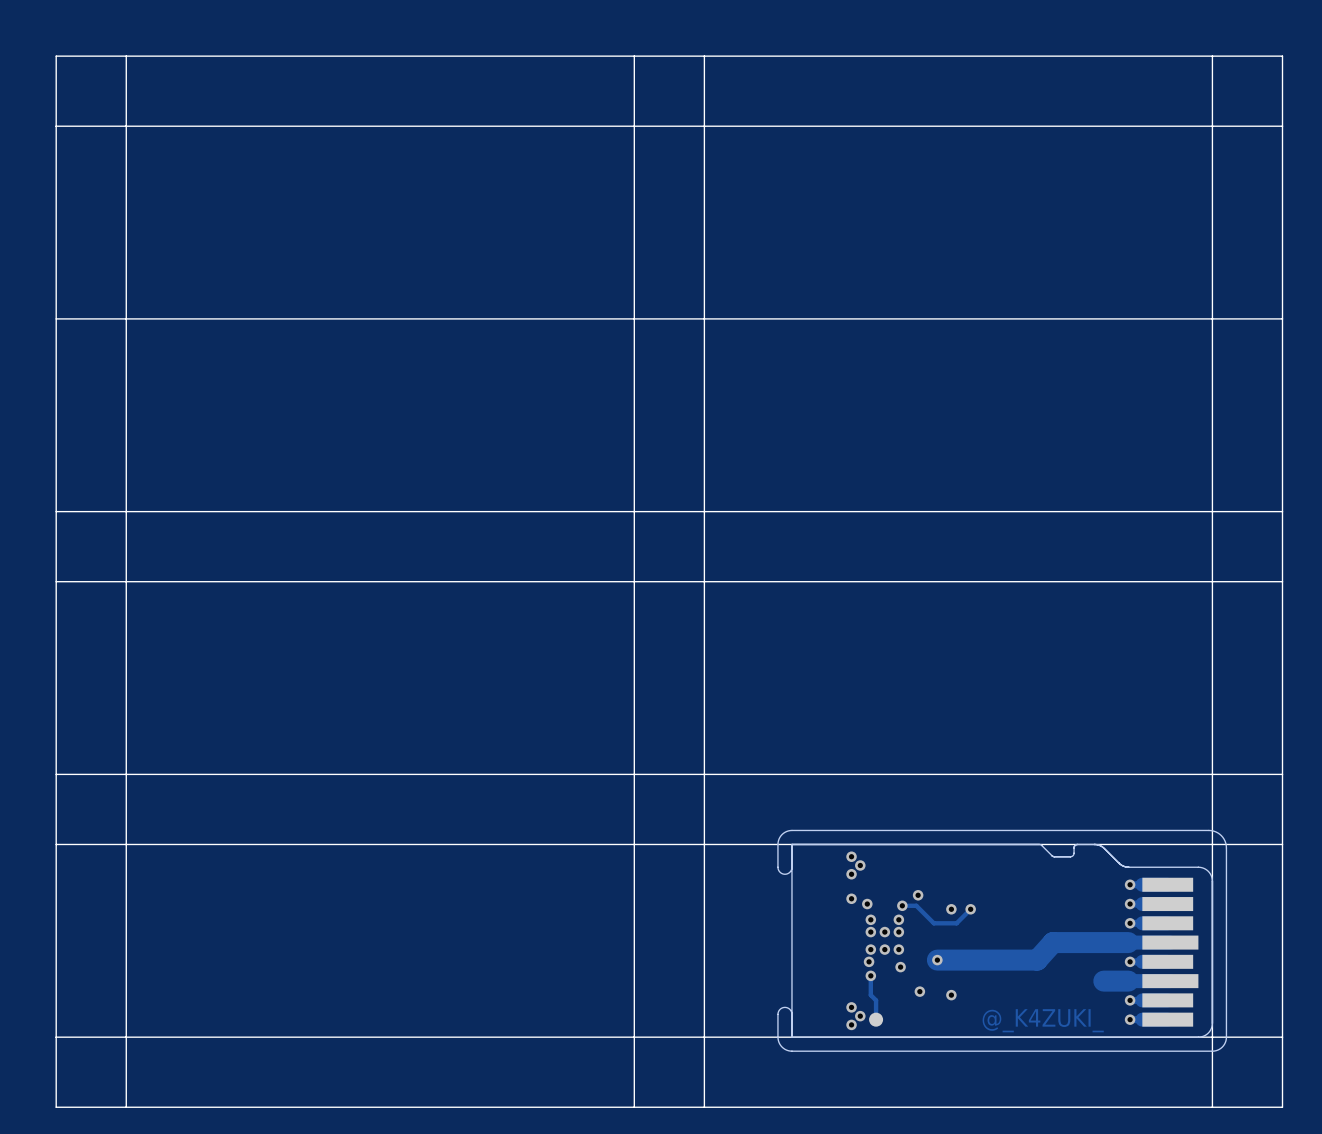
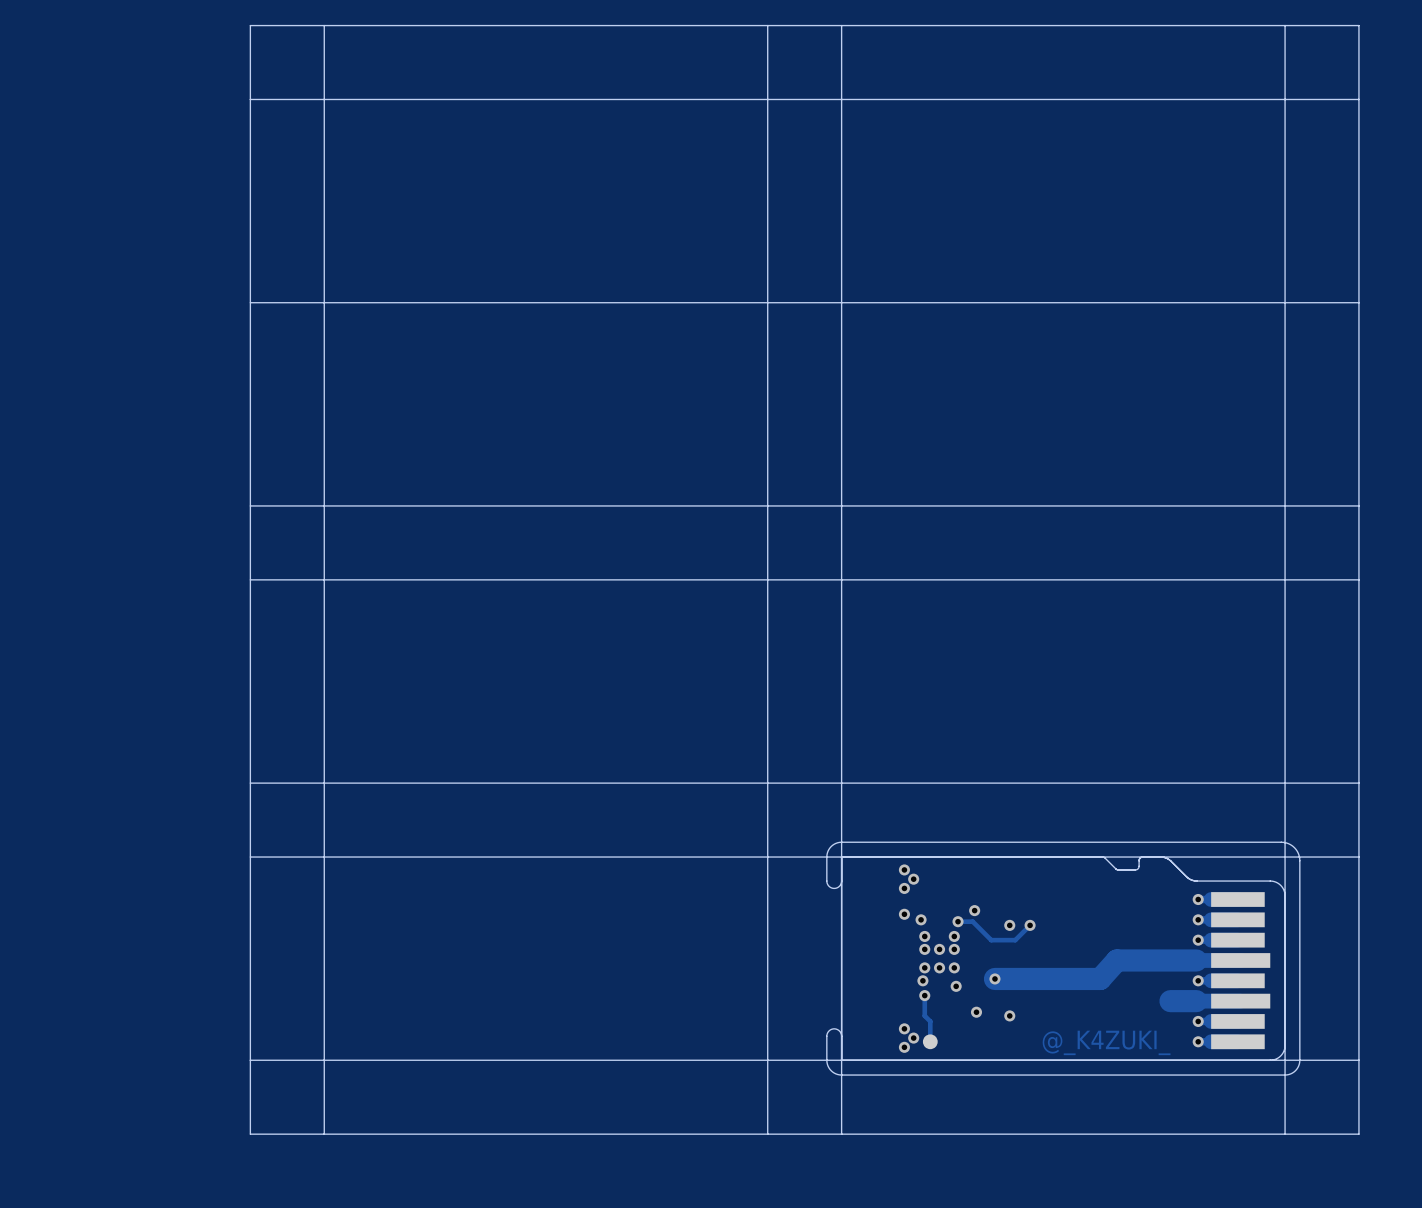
line: (126, 56) (126, 1107) -> none
board edge: none -> (324, 25) (324, 1134)
line: (634, 56) (634, 1107) -> none
line: (704, 56) (704, 1107) -> none
board edge: none -> (767, 25) (767, 1134)
board edge: none -> (841, 25) (841, 1134)
line: (1212, 56) (1212, 1107) -> none
board edge: none -> (1285, 25) (1285, 1134)
line: (1282, 56) (1282, 1107) (56, 1107) (56, 56) (1282, 56) -> none
board edge: none -> (1358, 25) (1358, 1134) (250, 1134) (250, 25) (1358, 25)
line: (1282, 126) (56, 126) -> none
board edge: none -> (1358, 99) (250, 99)
line: (1282, 318) (56, 318) -> none
board edge: none -> (1358, 302) (250, 302)
line: (1282, 511) (56, 511) -> none
board edge: none -> (1358, 505) (250, 505)
line: (1282, 581) (56, 581) -> none
board edge: none -> (1358, 579) (250, 579)
line: (1282, 774) (56, 774) -> none
board edge: none -> (1358, 783) (250, 783)
line: (1282, 844) (56, 844) -> none
board edge: none -> (1358, 857) (250, 857)
line: (1282, 1037) (56, 1037) -> none
board edge: none -> (1358, 1060) (250, 1060)

